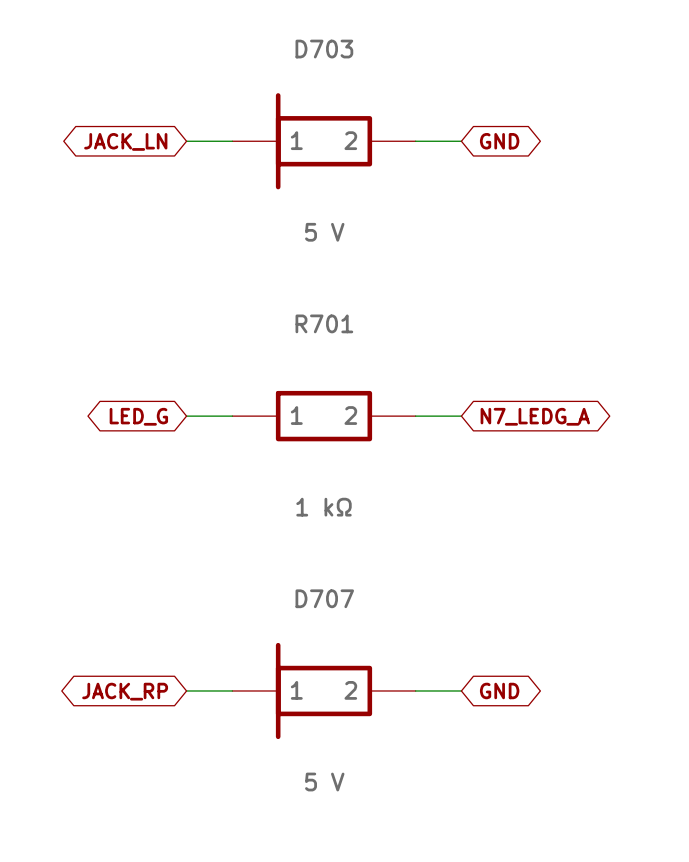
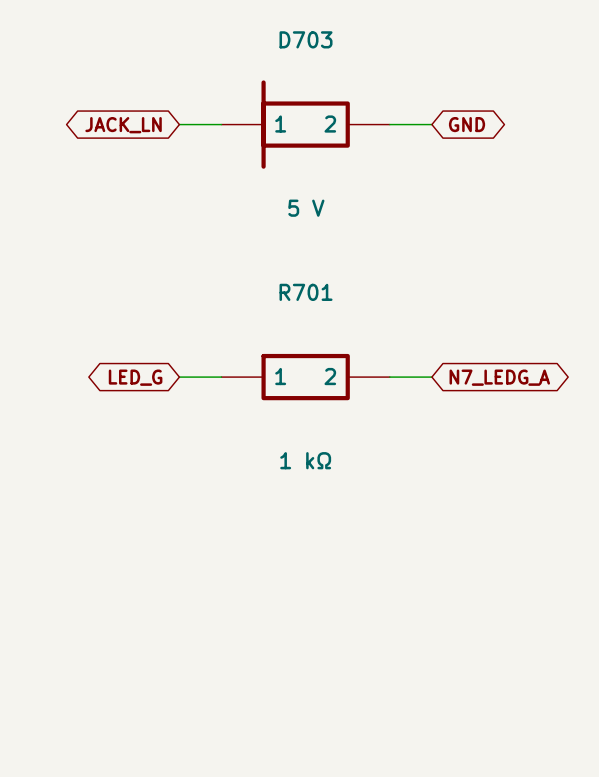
wire: (186, 690) (232, 690) -> none
D707: 5 V (323, 690) -> none
wire: (415, 690) (461, 690) -> none
global label: GND (499, 690) -> none
global label: JACK_RP (125, 691) -> none

